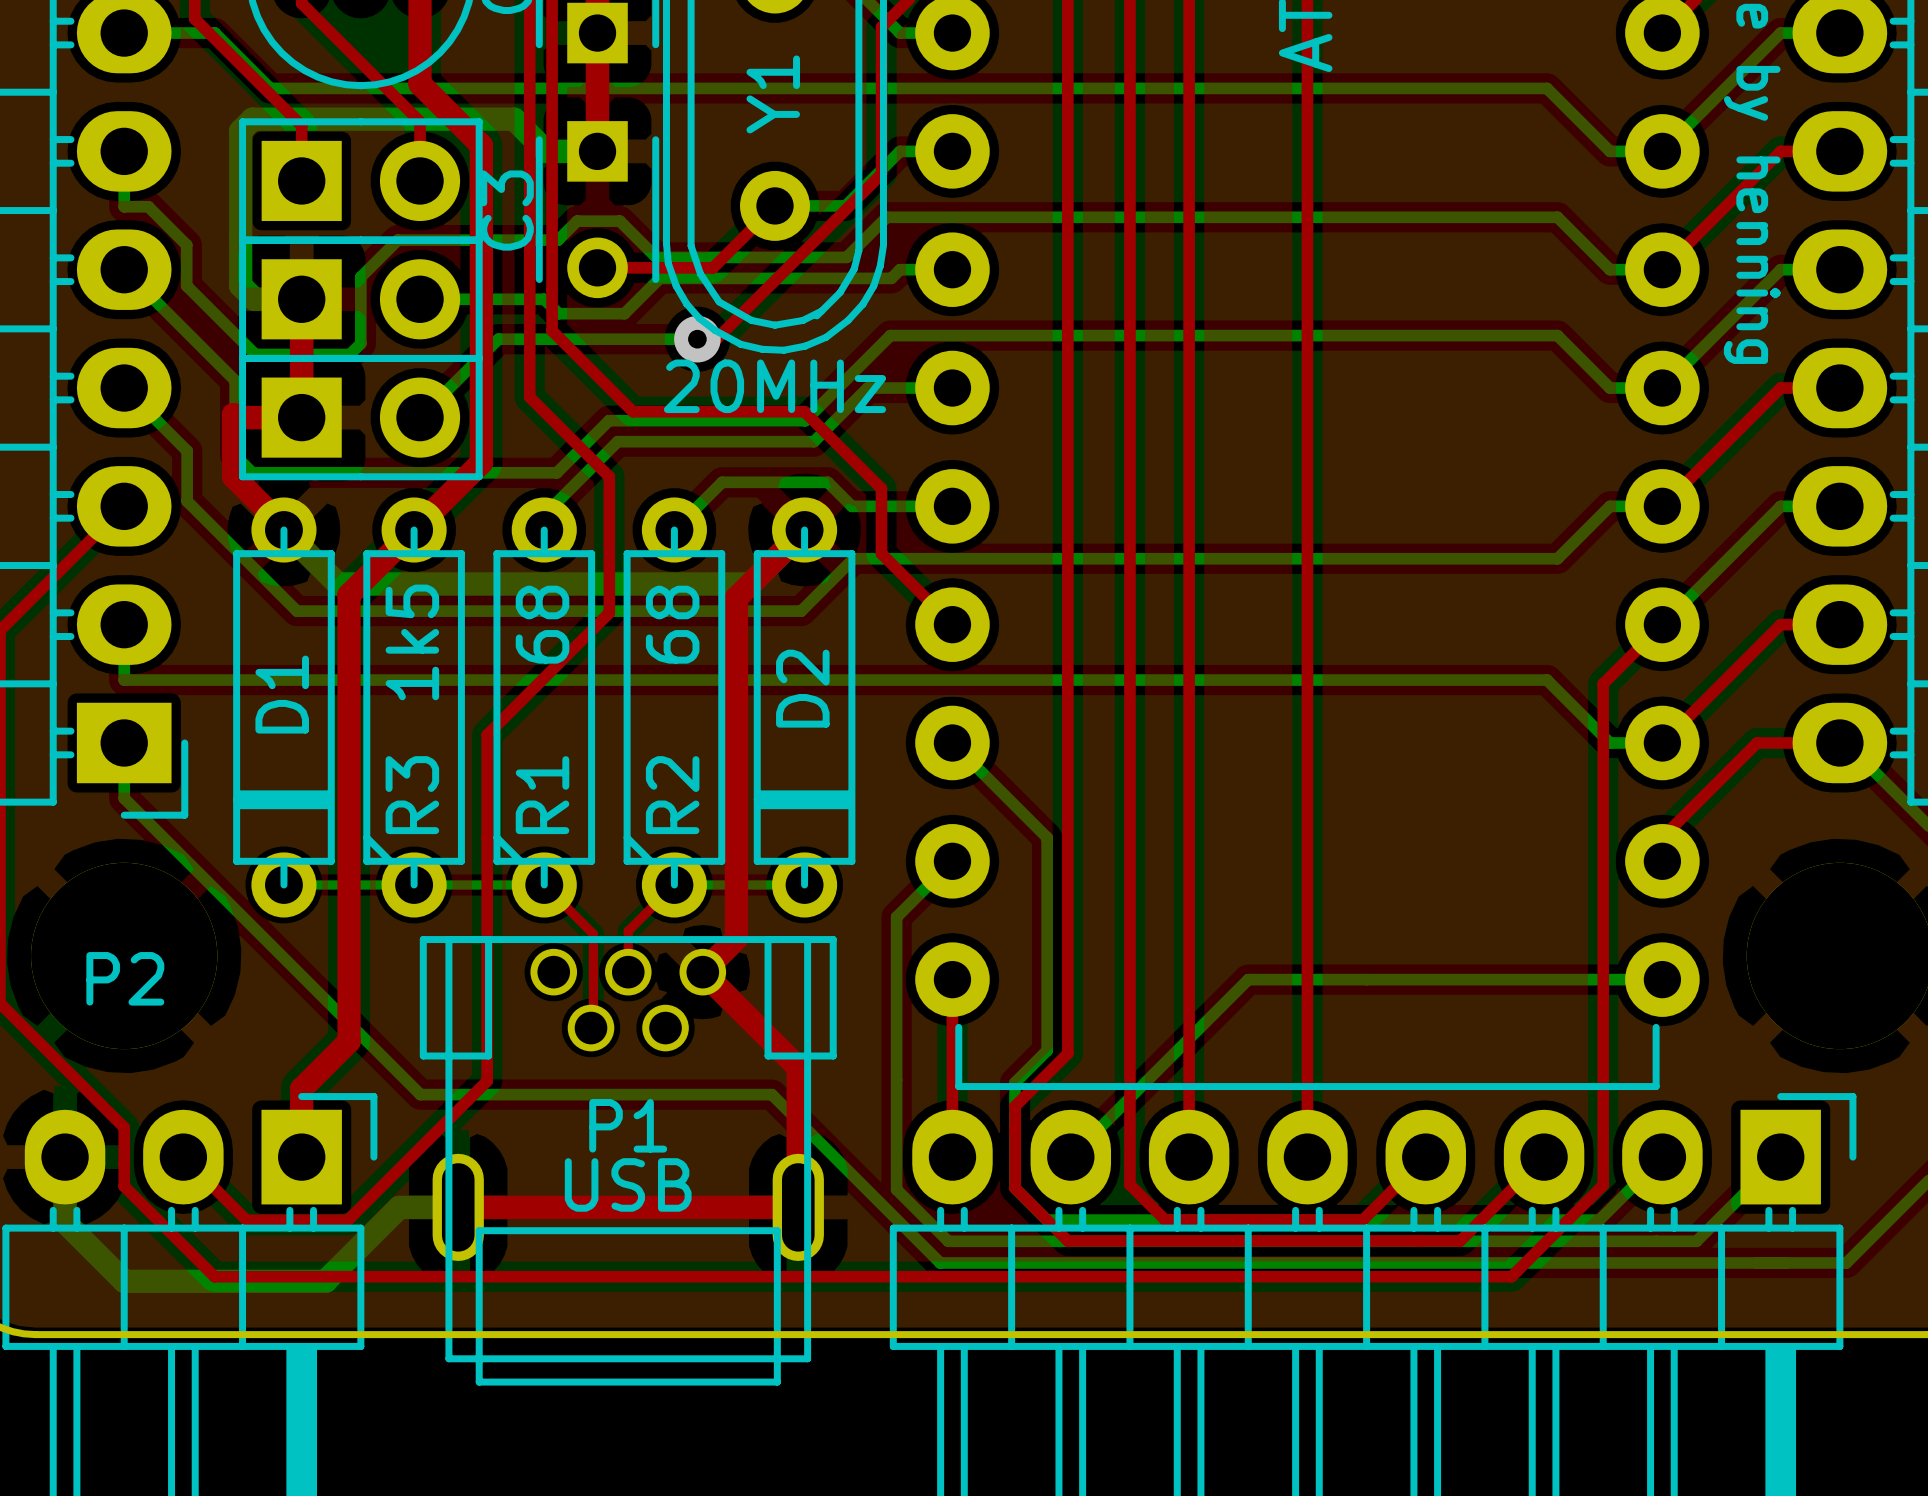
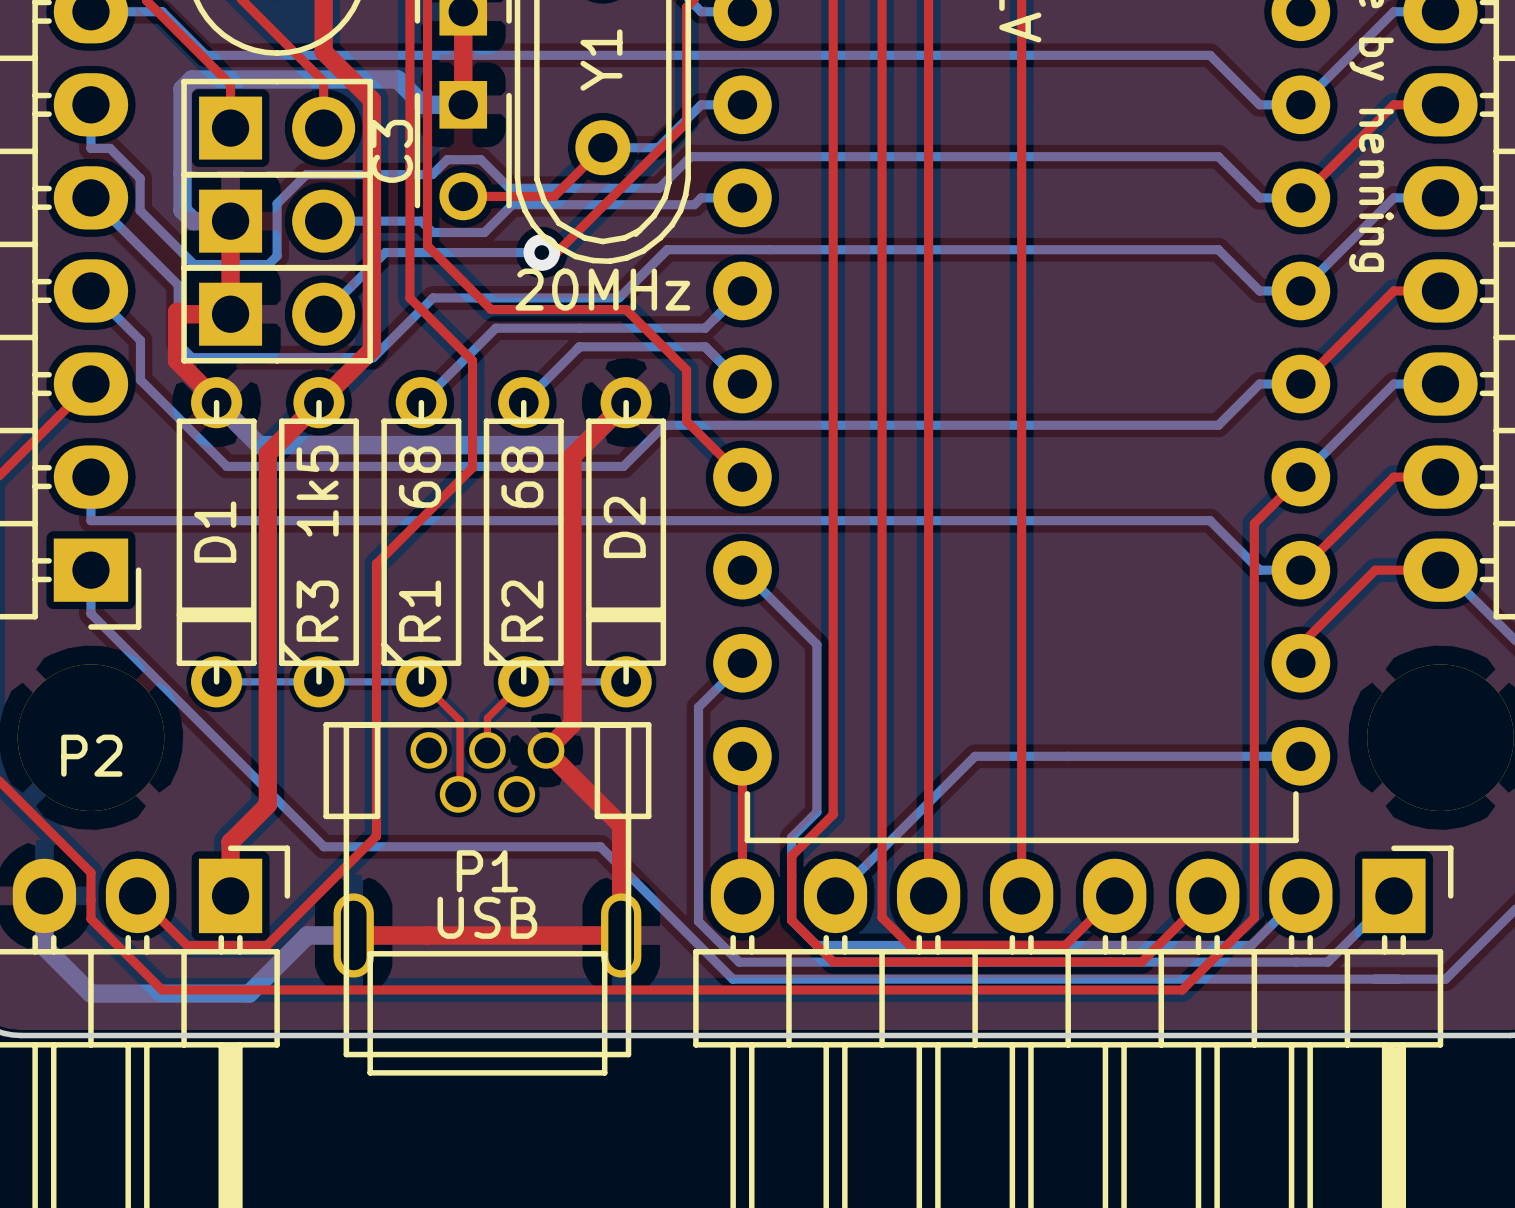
bottom track: (890, 335) (805, 420) (608, 420) (556, 472) (483, 472) -> (693, 249) (667, 249) (619, 297) (433, 297) (373, 357)
bottom track: (952, 388) (867, 388) (813, 441) (617, 441) (544, 515) (544, 530) -> (742, 290) (705, 328) (495, 328) (421, 402)
bottom track: (722, 482) (827, 482) (851, 506) (952, 506) -> (561, 365) (579, 346) (705, 346) (742, 384)

